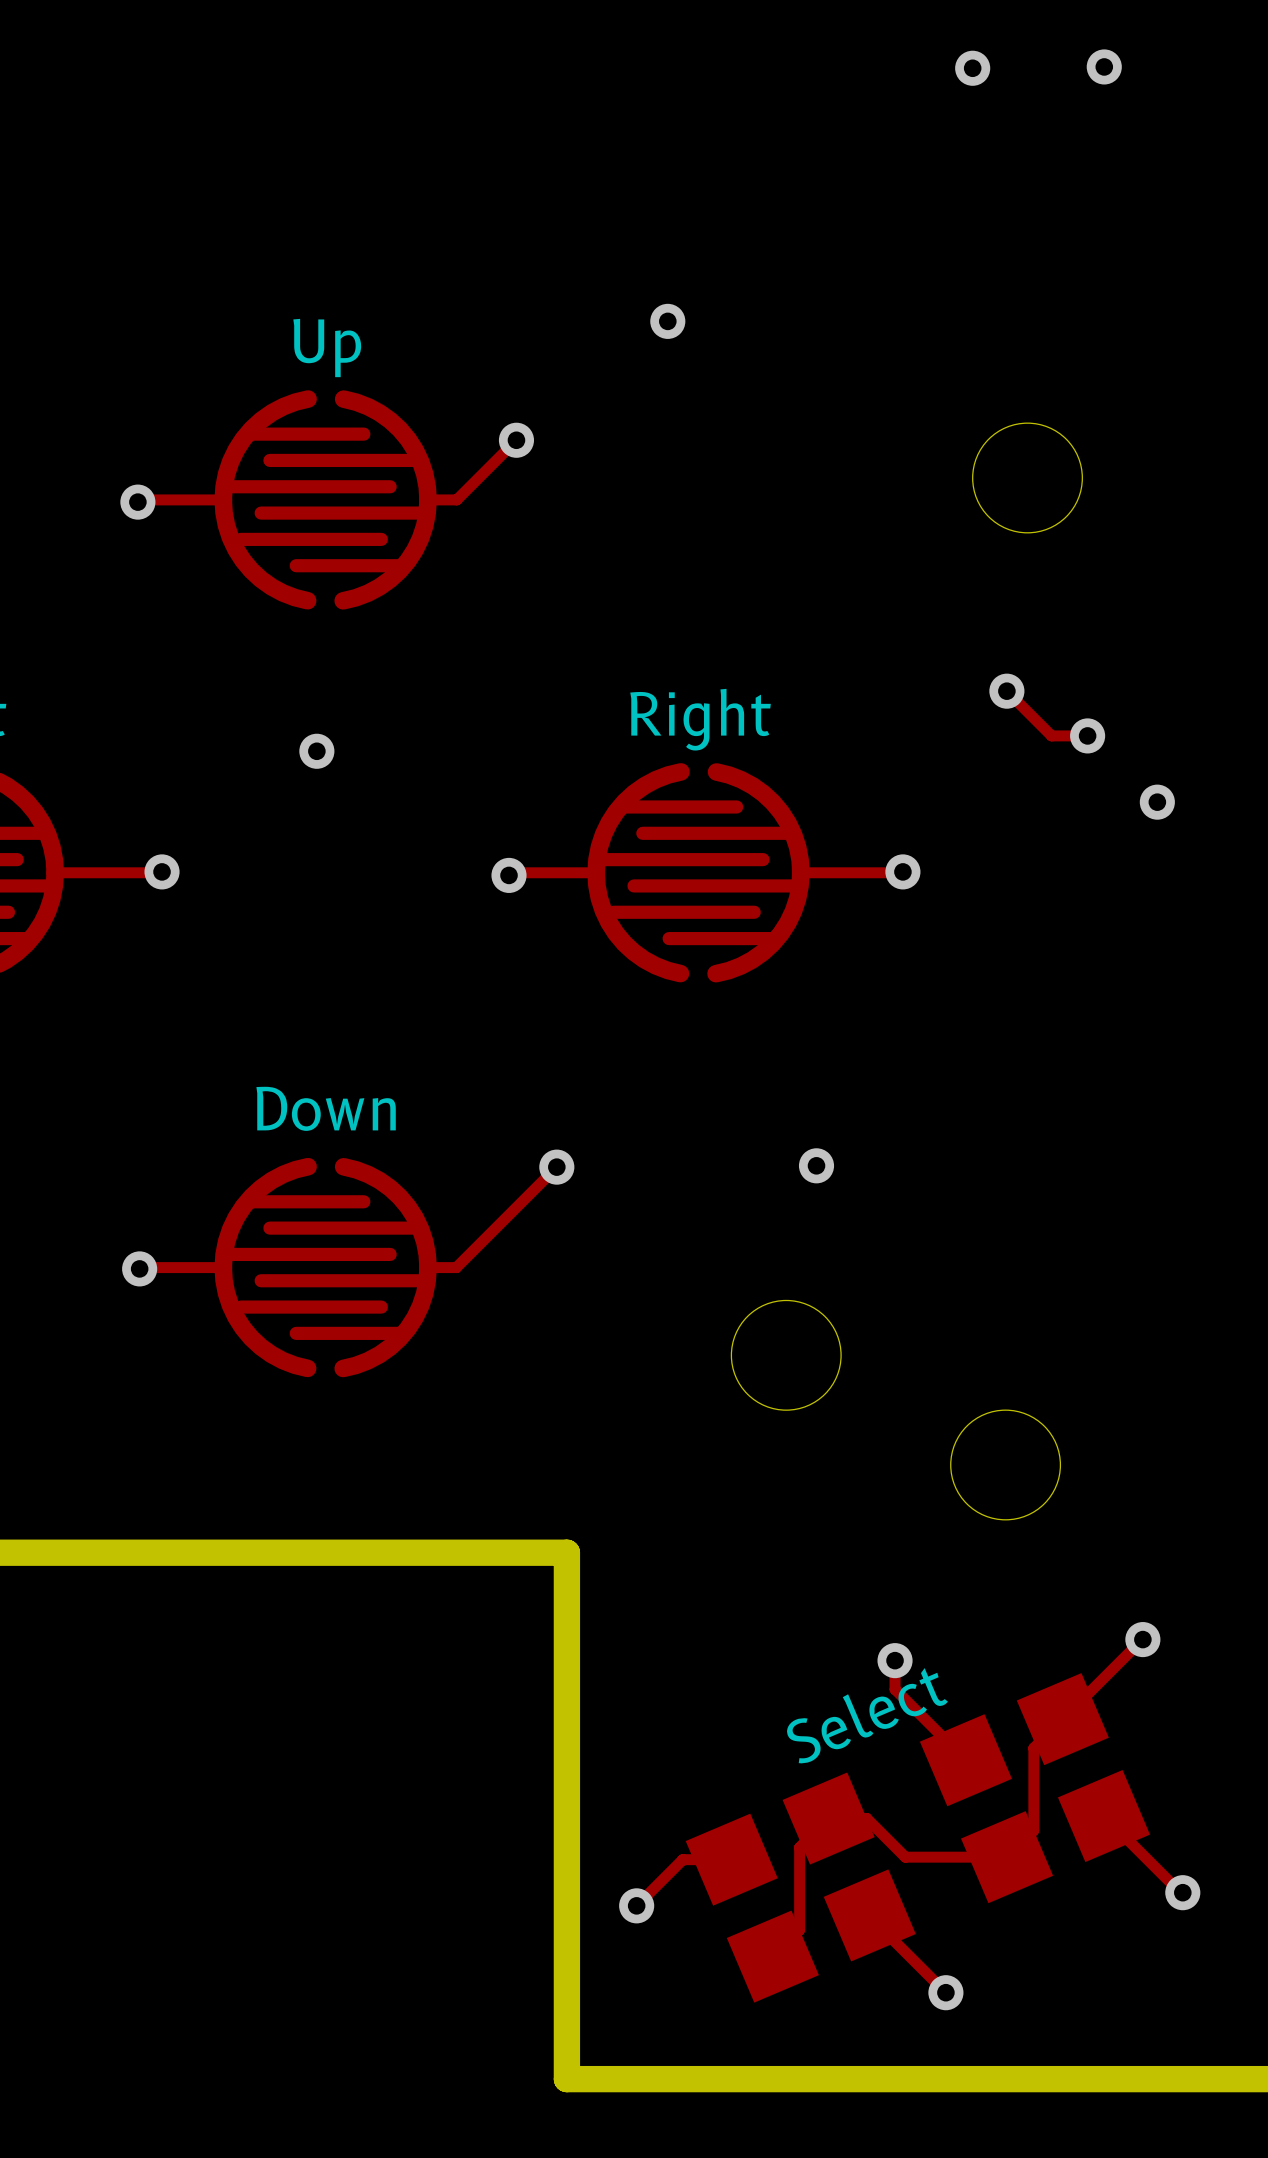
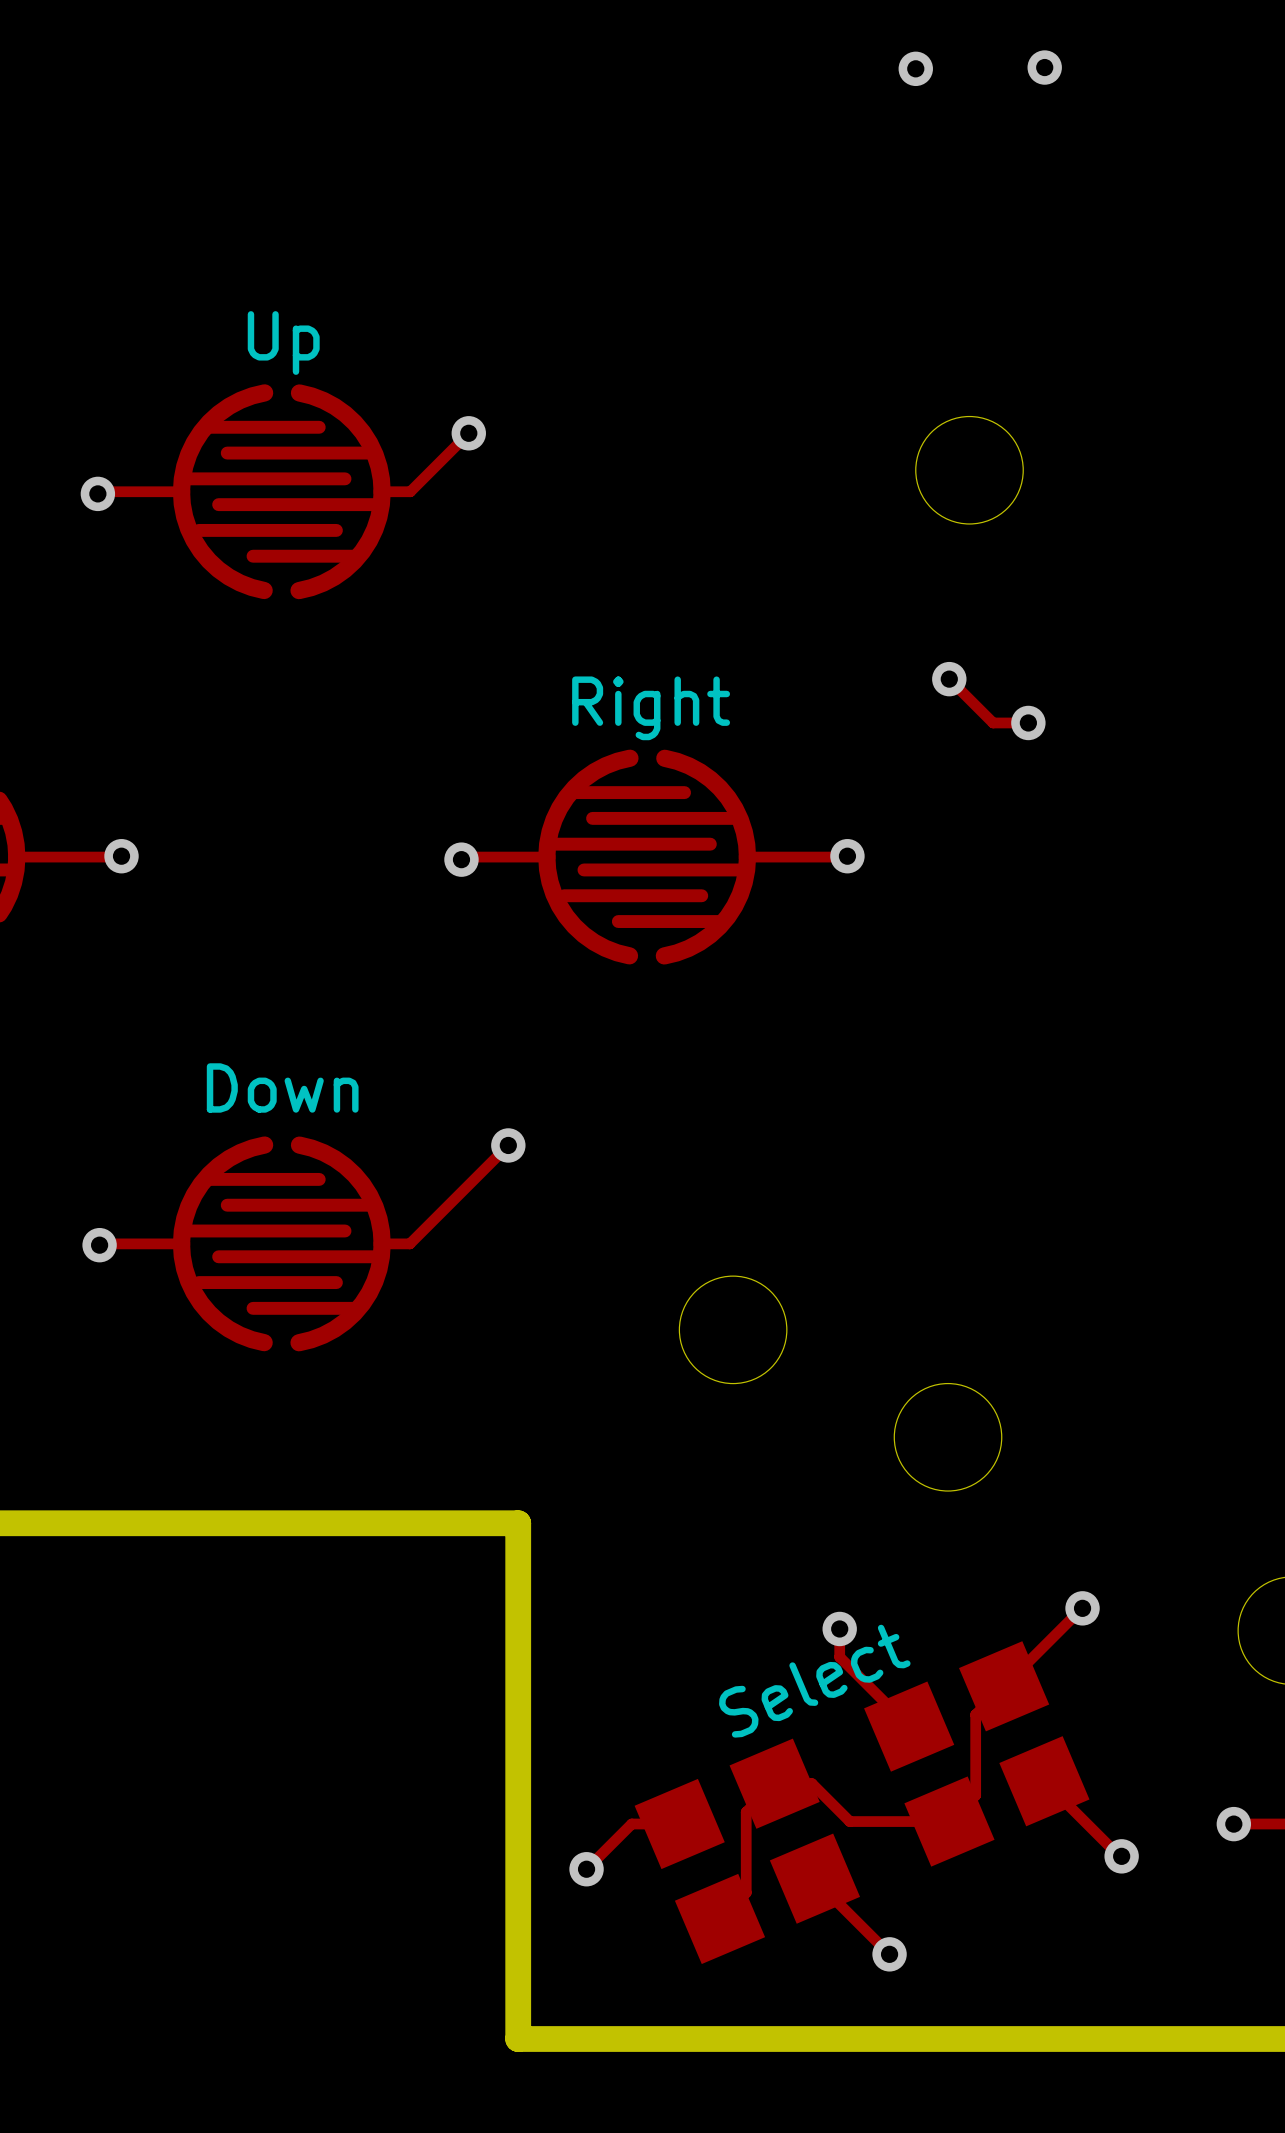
via: (667, 321) -> none
via: (316, 751) -> none
via: (1157, 802) -> none
via: (816, 1165) -> none

